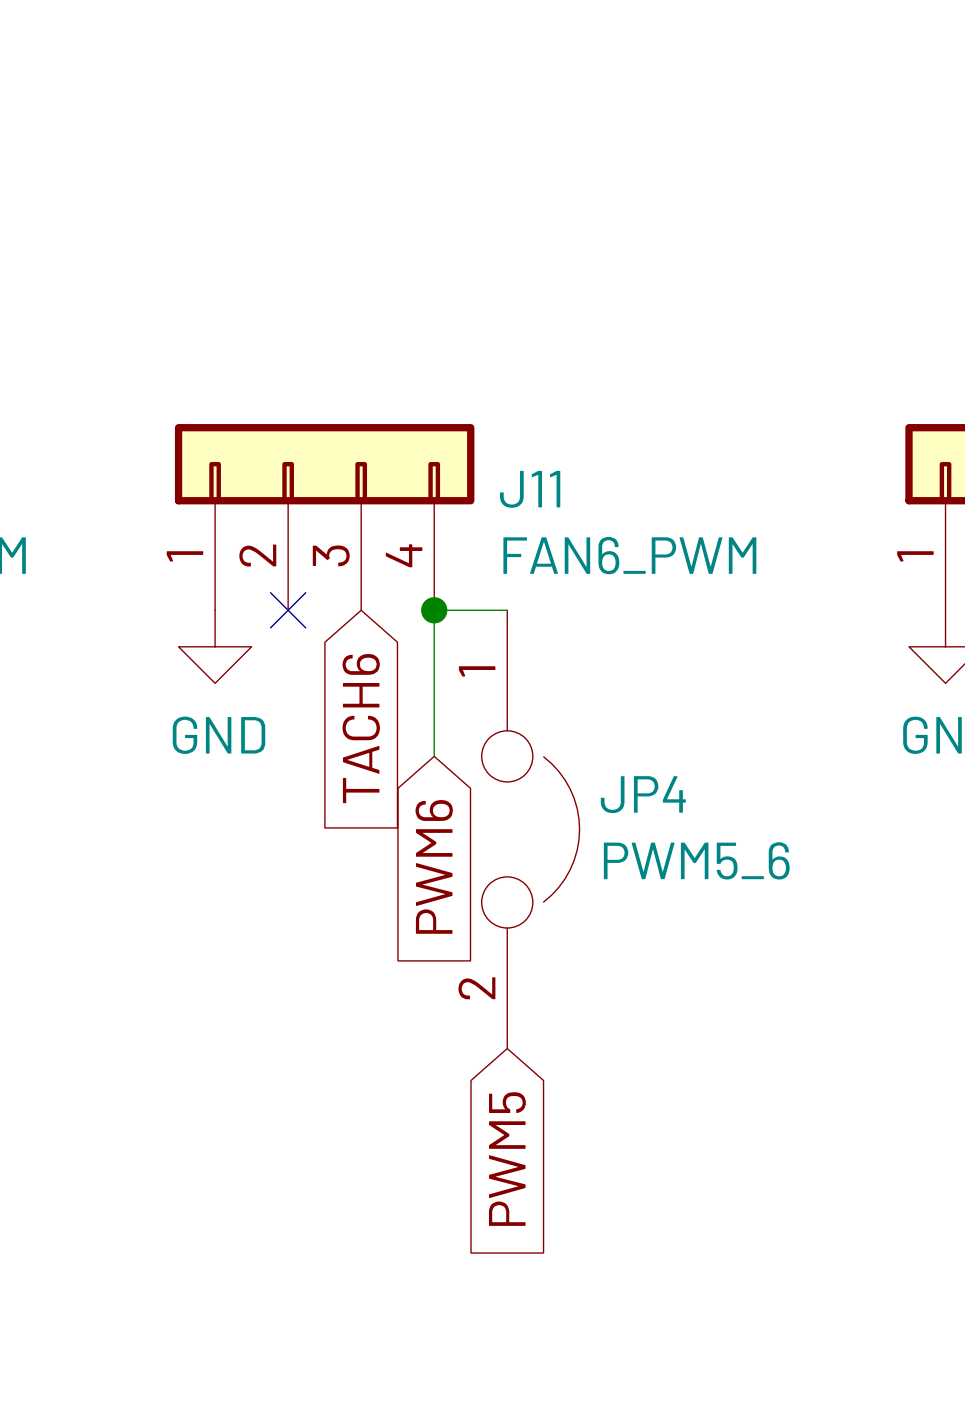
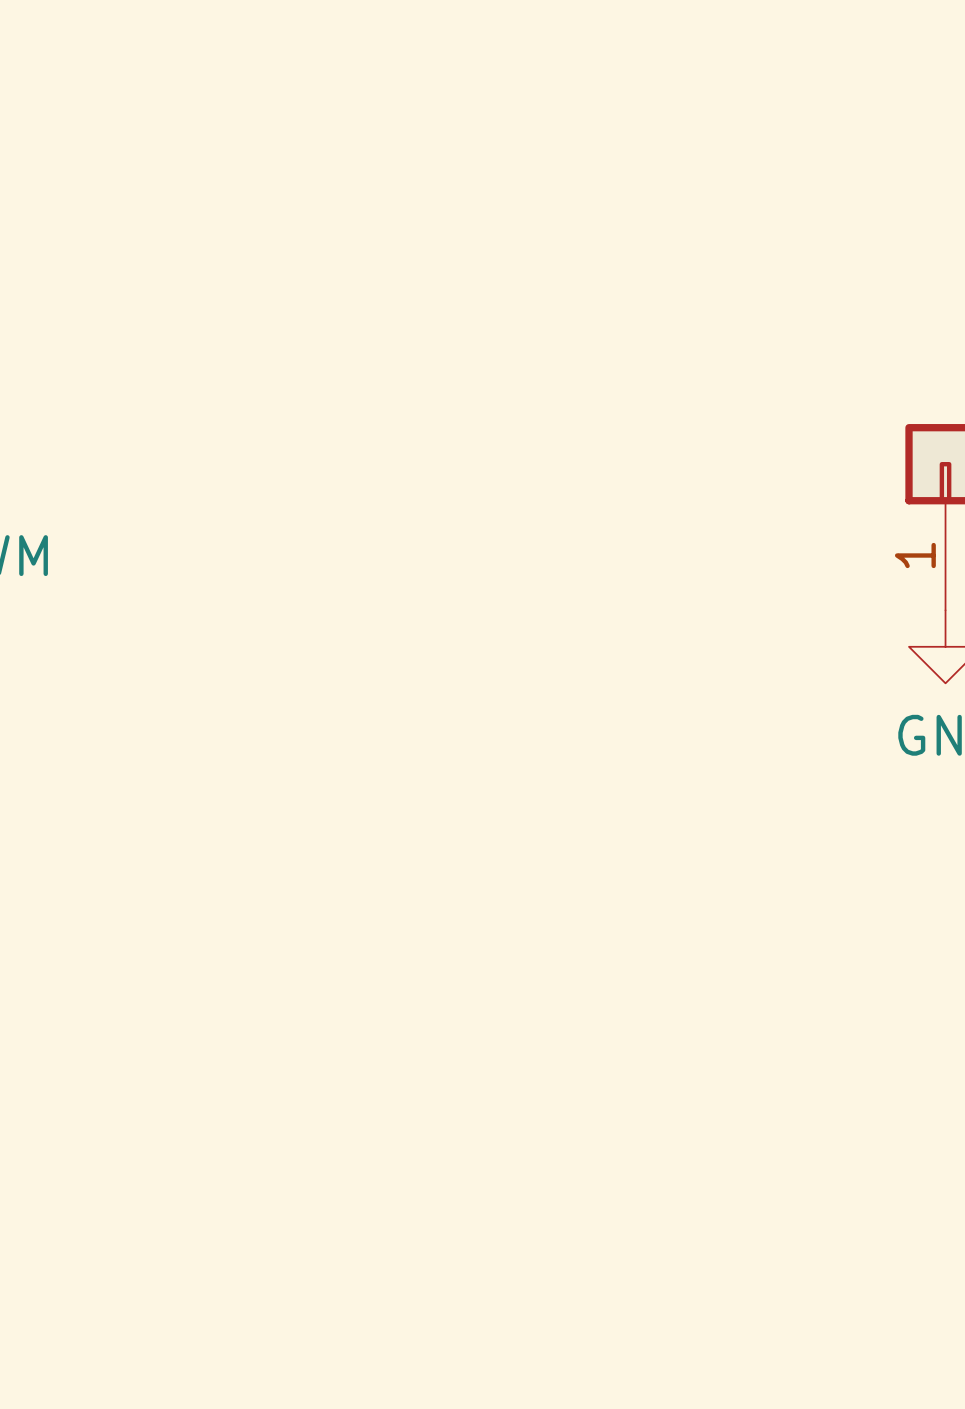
J11: FAN6_PWM (324, 517) -> none
no-connect mark: (288, 610) -> none
junction: (434, 610) -> none
wire: (507, 610) (434, 610) (434, 756) -> none
power symbol: GND (215, 646) -> none
global label: TACH6 (361, 728) -> none
JP4: PWM5_6 (530, 829) -> none
global label: PWM6 (434, 866) -> none
global label: PWM5 (507, 1159) -> none

